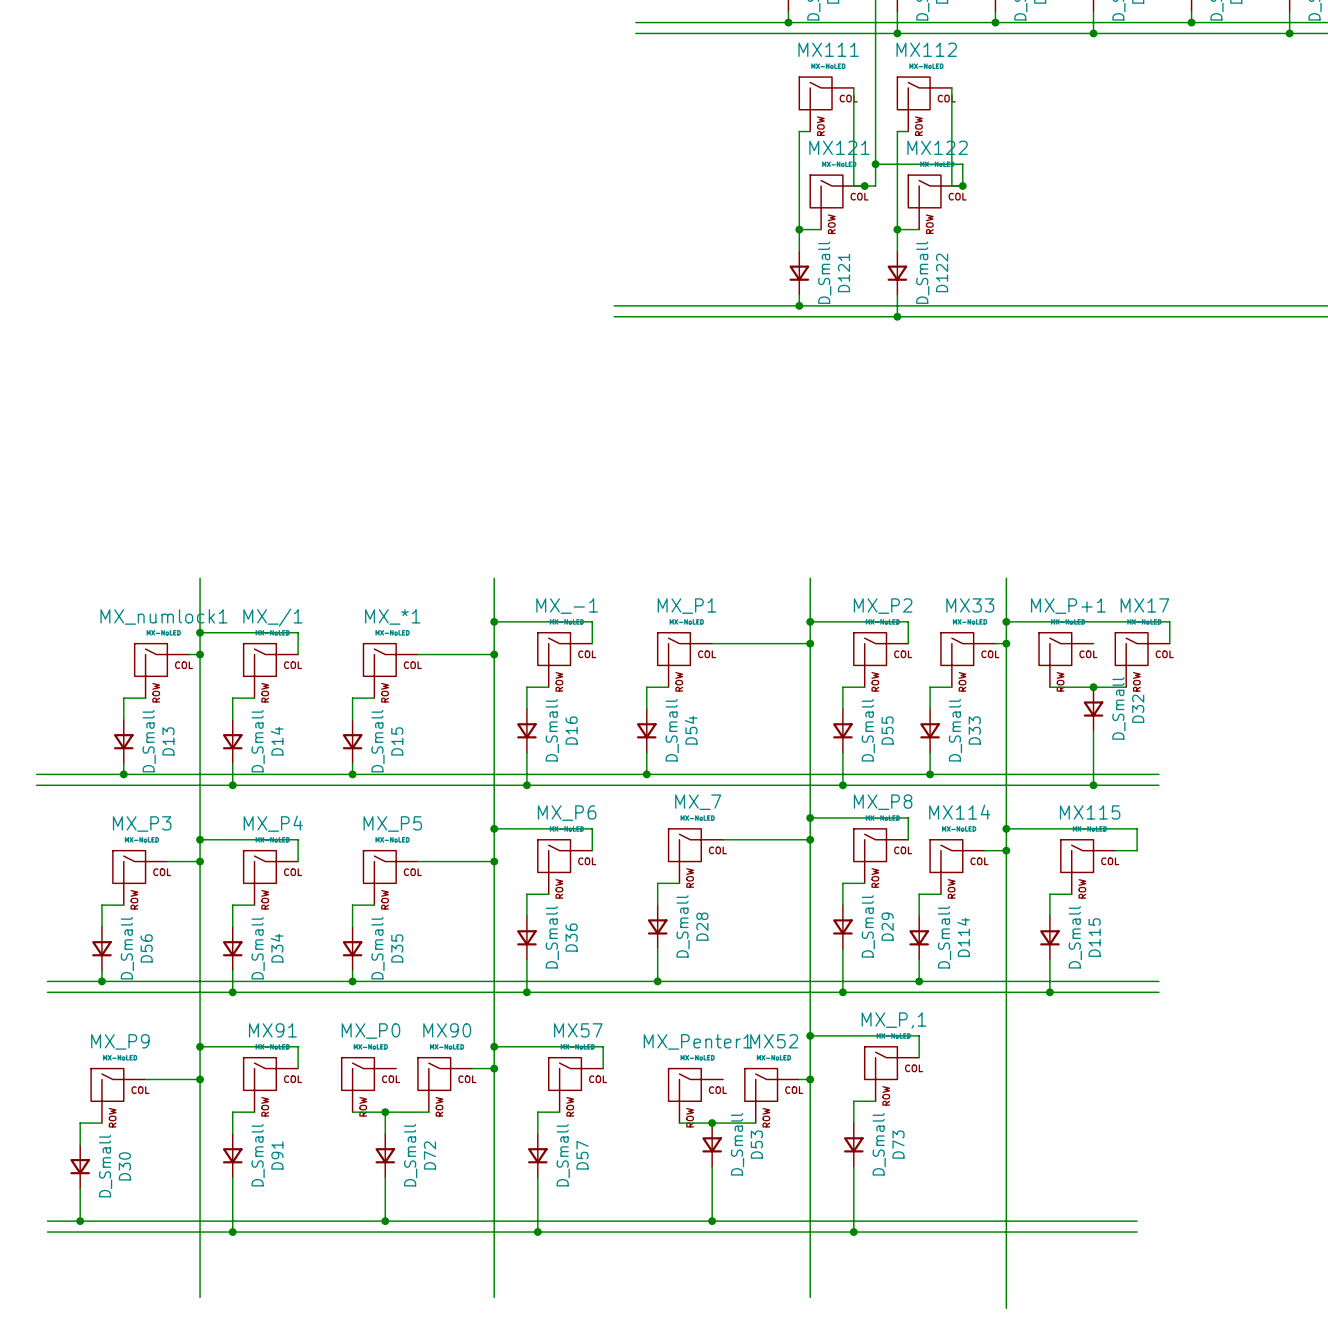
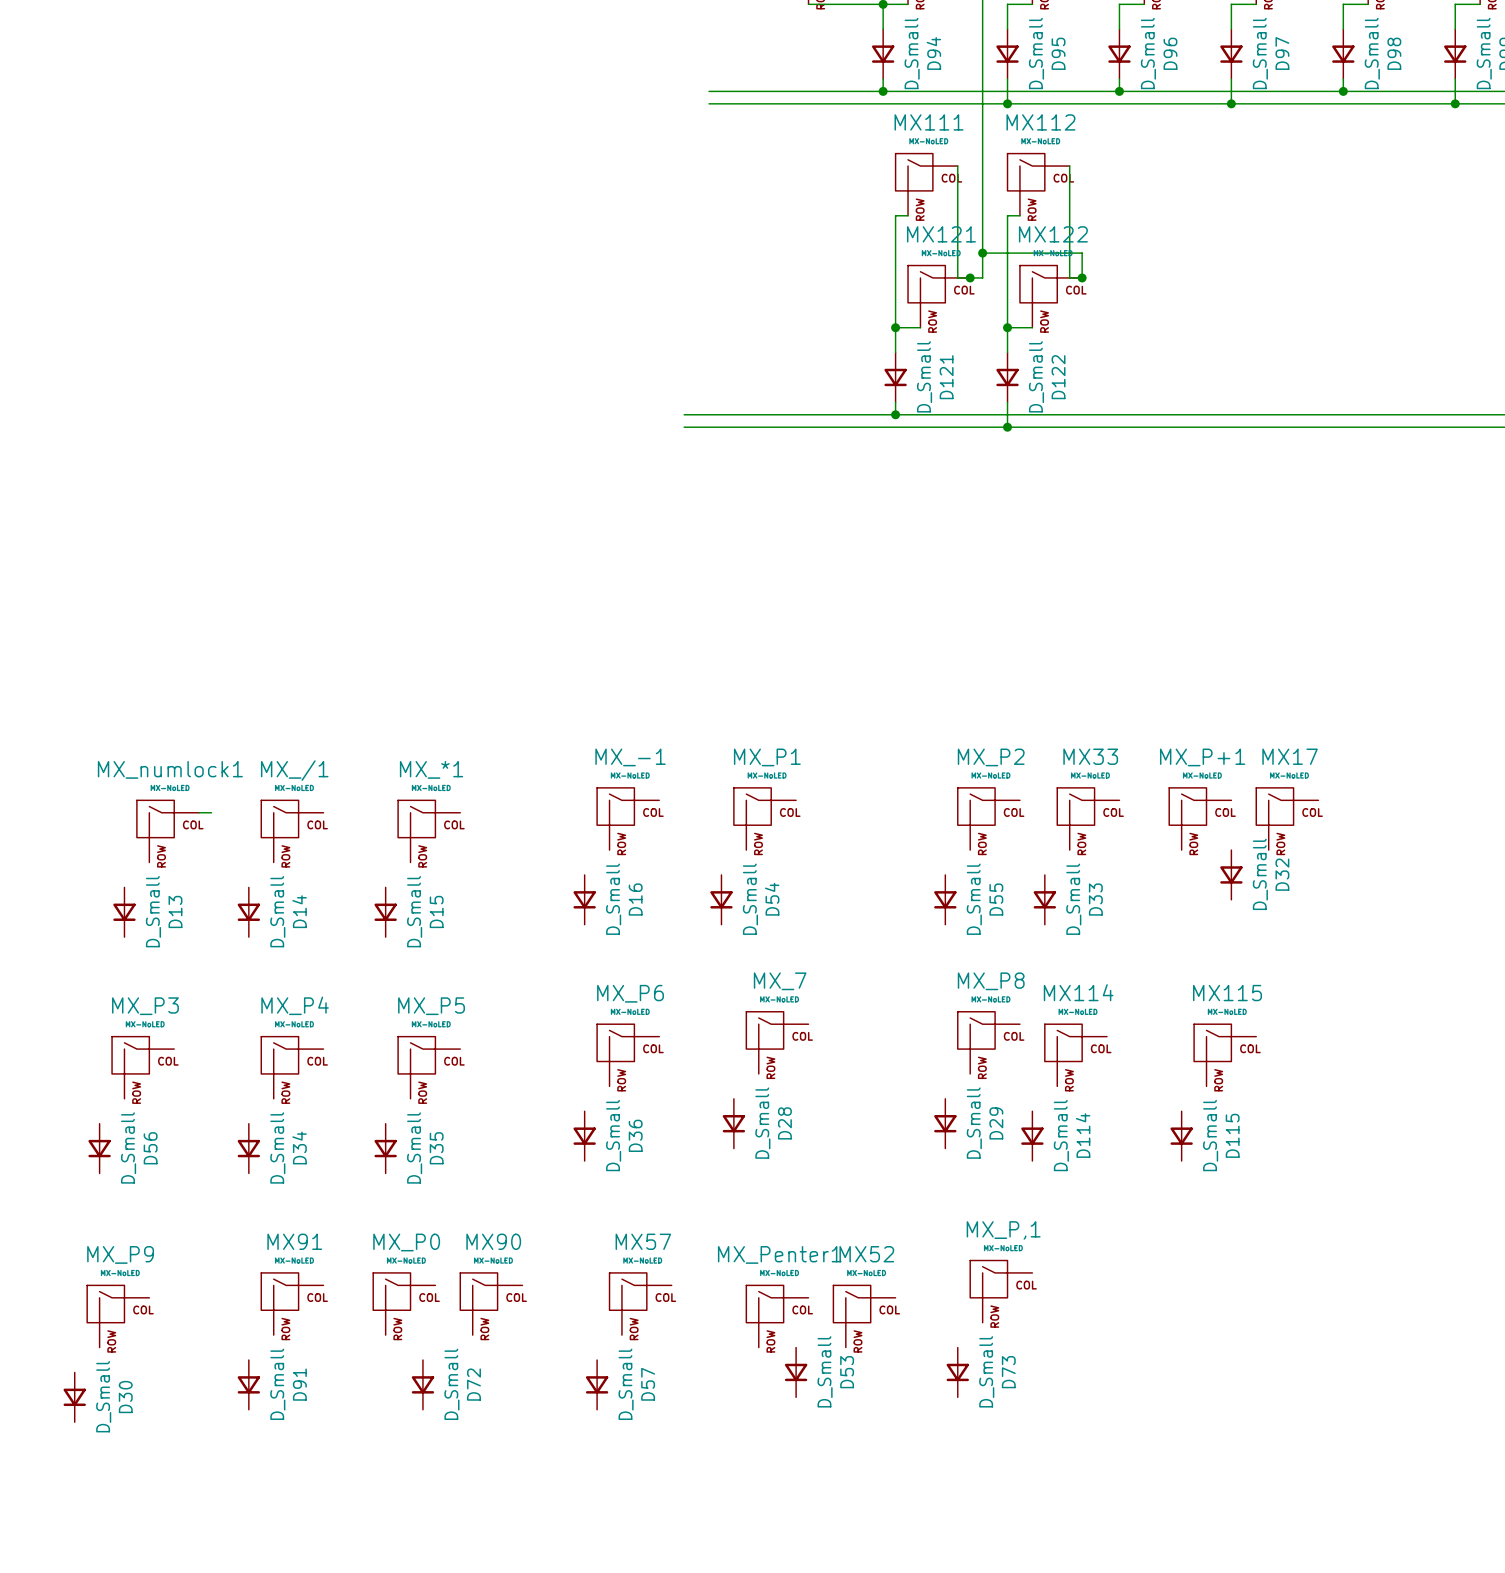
wire: (200, 578) (200, 1297) -> none
wire: (494, 578) (494, 1297) -> none
wire: (810, 578) (810, 1297) -> none
wire: (1006, 578) (1006, 1308) -> none
wire: (494, 621) (592, 621) (592, 643) -> none
junction: (494, 621) -> none
wire: (810, 621) (908, 621) (908, 643) -> none
junction: (810, 621) -> none
wire: (1006, 621) (1169, 621) (1169, 643) -> none
junction: (1006, 621) -> none
wire: (200, 632) (298, 632) (298, 654) -> none
junction: (200, 632) -> none
wire: (712, 643) (810, 643) -> none
junction: (810, 643) -> none
wire: (995, 643) (1006, 643) -> none
junction: (1006, 643) -> none
junction: (200, 654) -> none
wire: (417, 654) (494, 654) -> none
junction: (494, 654) -> none
wire: (548, 687) (526, 687) (526, 709) -> none
wire: (668, 687) (646, 687) (646, 709) -> none
wire: (864, 687) (842, 687) (842, 709) -> none
wire: (951, 687) (930, 687) (930, 709) -> none
wire: (1049, 687) (1126, 687) -> none
junction: (1093, 687) -> none
wire: (145, 698) (123, 698) (123, 719) -> none
wire: (254, 698) (232, 698) (232, 719) -> none
wire: (374, 698) (352, 698) (352, 719) -> none
wire: (1093, 730) (1093, 785) -> none
wire: (526, 752) (526, 785) -> none
wire: (646, 752) (646, 774) -> none
wire: (842, 752) (842, 785) -> none
wire: (930, 752) (930, 774) -> none
wire: (123, 763) (123, 774) -> none
wire: (232, 763) (232, 785) -> none
wire: (352, 763) (352, 774) -> none
wire: (36, 774) (1158, 774) -> none
junction: (123, 774) -> none
junction: (352, 774) -> none
junction: (646, 774) -> none
junction: (930, 774) -> none
wire: (36, 785) (1158, 785) -> none
junction: (232, 785) -> none
junction: (526, 785) -> none
junction: (842, 785) -> none
junction: (1093, 785) -> none
wire: (810, 817) (908, 817) (908, 839) -> none
junction: (810, 817) -> none
wire: (494, 828) (592, 828) (592, 850) -> none
junction: (494, 828) -> none
wire: (1006, 828) (1137, 828) (1137, 850) (1115, 850) -> none
junction: (1006, 828) -> none
wire: (200, 839) (298, 839) (298, 861) -> none
junction: (200, 839) -> none
wire: (723, 839) (810, 839) -> none
junction: (810, 839) -> none
wire: (984, 850) (1006, 850) -> none
junction: (1006, 850) -> none
wire: (167, 861) (200, 861) -> none
junction: (200, 861) -> none
wire: (417, 861) (494, 861) -> none
junction: (494, 861) -> none
wire: (679, 883) (657, 883) (657, 905) -> none
wire: (864, 883) (842, 883) (842, 905) -> none
wire: (548, 894) (526, 894) (526, 916) -> none
wire: (940, 894) (919, 894) (919, 916) -> none
wire: (1071, 894) (1049, 894) (1049, 916) -> none
wire: (123, 905) (101, 905) (101, 926) -> none
wire: (254, 905) (232, 905) (232, 926) -> none
wire: (374, 905) (352, 905) (352, 926) -> none
wire: (657, 948) (657, 981) -> none
wire: (842, 948) (842, 992) -> none
wire: (526, 959) (526, 992) -> none
wire: (919, 959) (919, 981) -> none
wire: (1049, 959) (1049, 992) -> none
wire: (101, 970) (101, 981) -> none
wire: (232, 970) (232, 992) -> none
wire: (352, 970) (352, 981) -> none
wire: (47, 981) (1158, 981) -> none
junction: (101, 981) -> none
junction: (352, 981) -> none
junction: (657, 981) -> none
junction: (919, 981) -> none
wire: (47, 992) (1158, 992) -> none
junction: (232, 992) -> none
junction: (526, 992) -> none
junction: (842, 992) -> none
junction: (1049, 992) -> none
wire: (810, 1035) (919, 1035) (919, 1057) -> none
junction: (810, 1035) -> none
wire: (200, 1046) (298, 1046) (298, 1068) -> none
junction: (200, 1046) -> none
wire: (494, 1046) (603, 1046) (603, 1068) -> none
junction: (494, 1046) -> none
wire: (472, 1068) (494, 1068) -> none
junction: (494, 1068) -> none
wire: (145, 1079) (200, 1079) -> none
junction: (200, 1079) -> none
wire: (799, 1079) (810, 1079) -> none
junction: (810, 1079) -> none
wire: (875, 1101) (853, 1101) (853, 1123) -> none
wire: (254, 1112) (232, 1112) (232, 1133) -> none
wire: (352, 1112) (428, 1112) -> none
wire: (385, 1112) (385, 1133) -> none
junction: (385, 1112) -> none
wire: (559, 1112) (537, 1112) (537, 1133) -> none
wire: (101, 1123) (80, 1123) (80, 1144) -> none
wire: (679, 1123) (755, 1123) -> none
junction: (712, 1123) -> none
wire: (712, 1166) (712, 1221) -> none
wire: (853, 1166) (853, 1232) -> none
wire: (232, 1177) (232, 1232) -> none
wire: (385, 1177) (385, 1221) -> none
wire: (537, 1177) (537, 1232) -> none
wire: (80, 1188) (80, 1221) -> none
wire: (47, 1221) (1137, 1221) -> none
junction: (80, 1221) -> none
junction: (385, 1221) -> none
junction: (712, 1221) -> none
wire: (47, 1232) (1137, 1232) -> none
junction: (232, 1232) -> none
junction: (537, 1232) -> none
junction: (853, 1232) -> none

